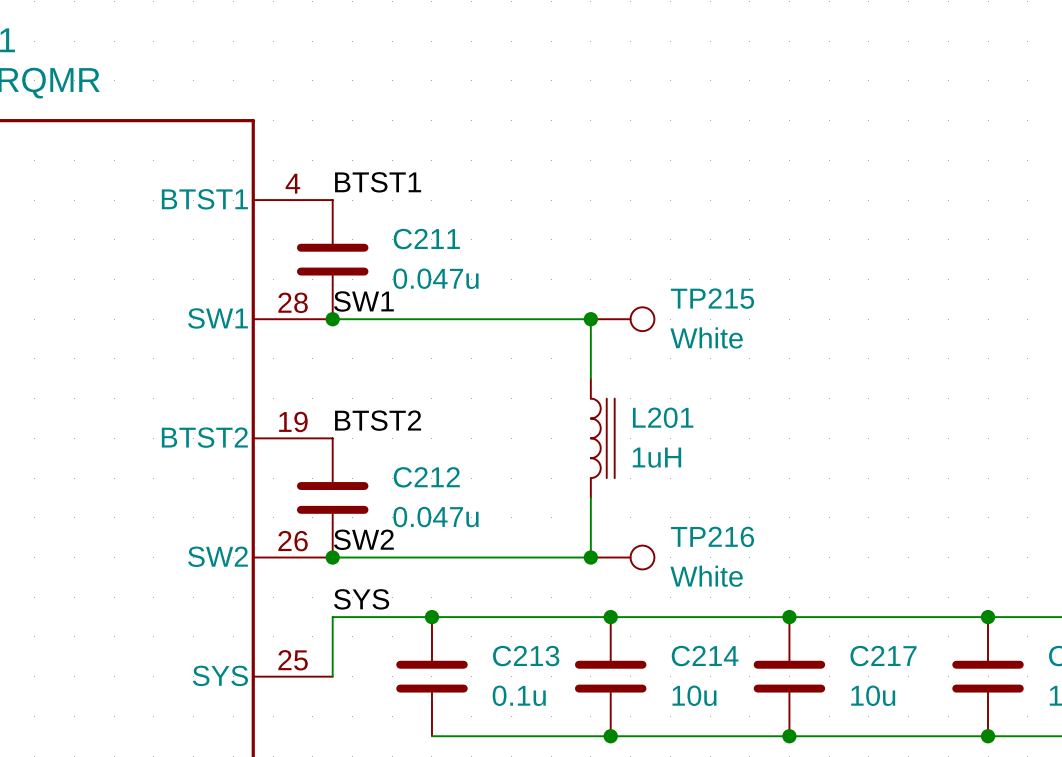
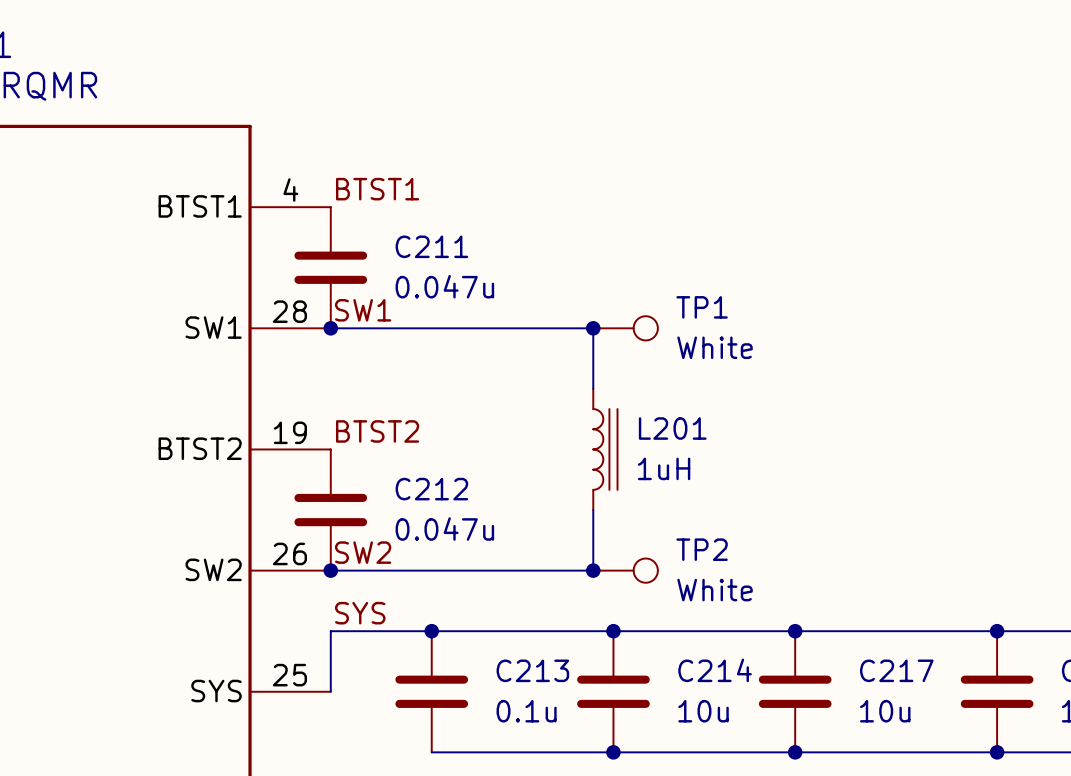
TP215 name: TP215 (712, 298) -> TP1 (702, 307)
TP216 name: TP216 (712, 536) -> TP2 (702, 549)

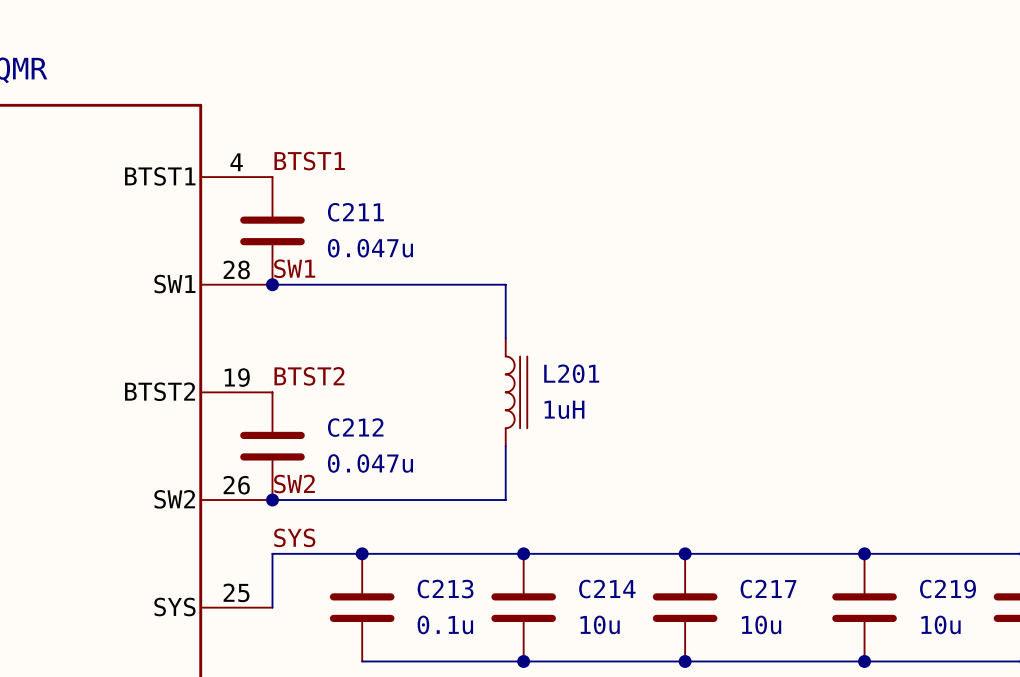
junction: (593, 328) -> none
TP1: White (625, 328) -> none
junction: (593, 570) -> none
TP2: White (625, 570) -> none

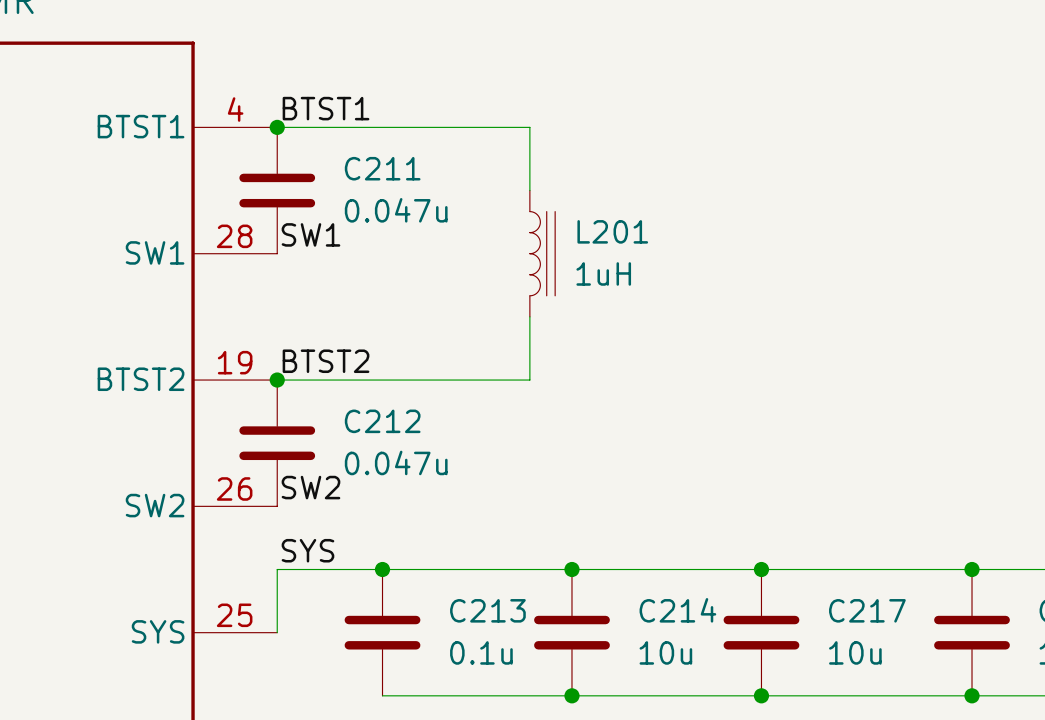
wire: none -> (277, 127) (529, 127) (529, 190)
junction: none -> (277, 127)
wire: (272, 284) (505, 284) (505, 338) -> none
junction: (272, 284) -> none
wire: none -> (529, 316) (529, 380) (277, 380)
junction: none -> (277, 380)
L201 position: (516, 392) -> (542, 253)
wire: (505, 446) (505, 500) (272, 500) -> none
junction: (272, 500) -> none

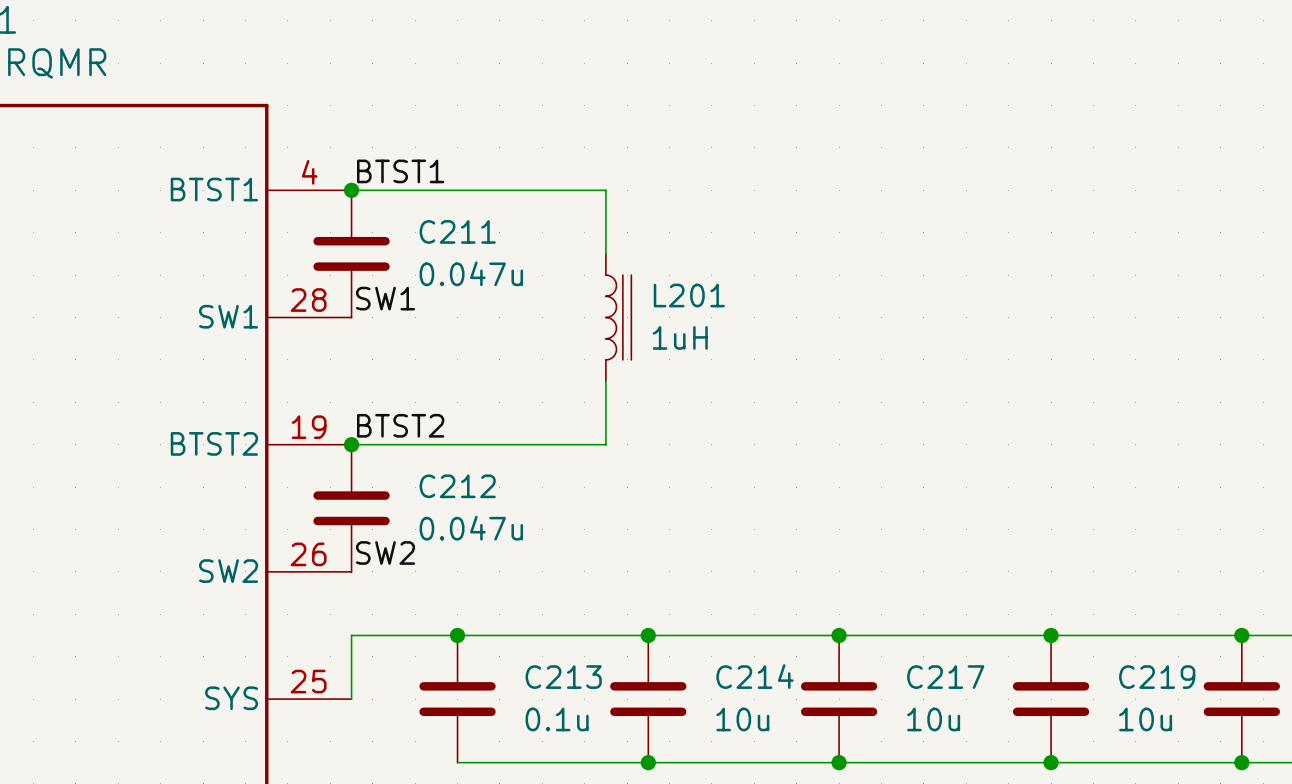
label: SYS (307, 550) -> none

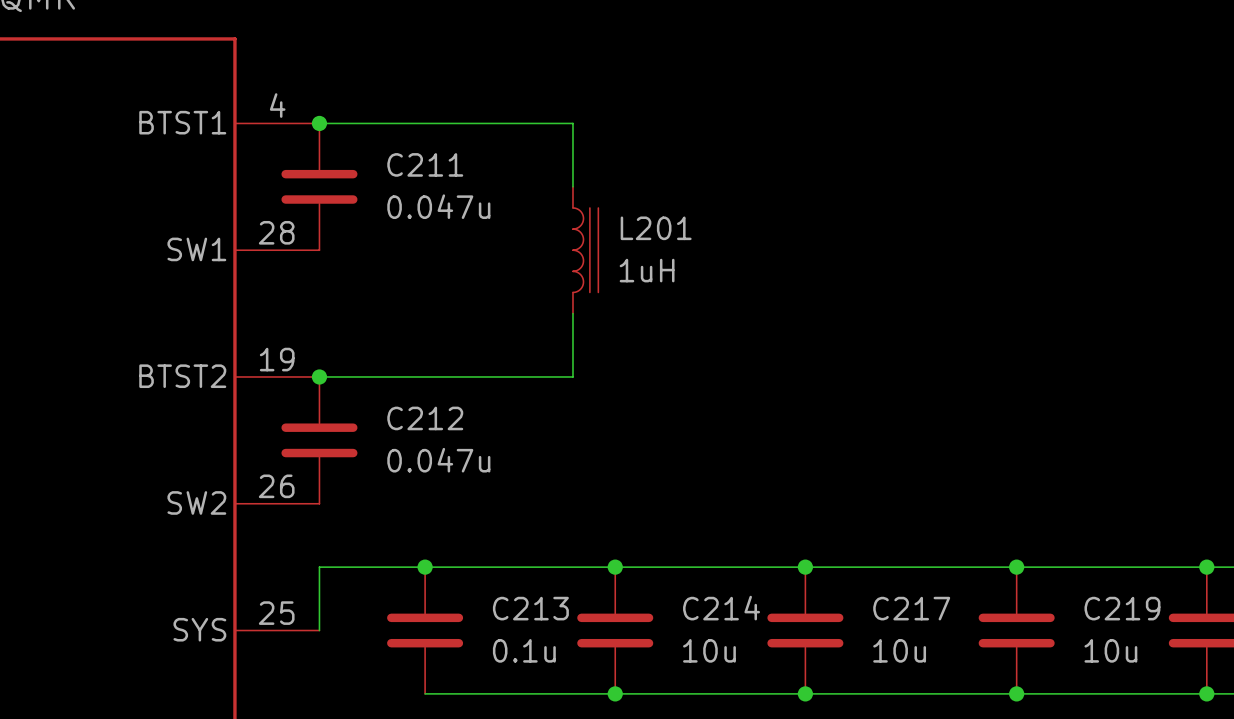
label: BTST1 (400, 171) -> none
label: SW1 (385, 298) -> none
label: BTST2 (400, 425) -> none
label: SW2 (385, 552) -> none

